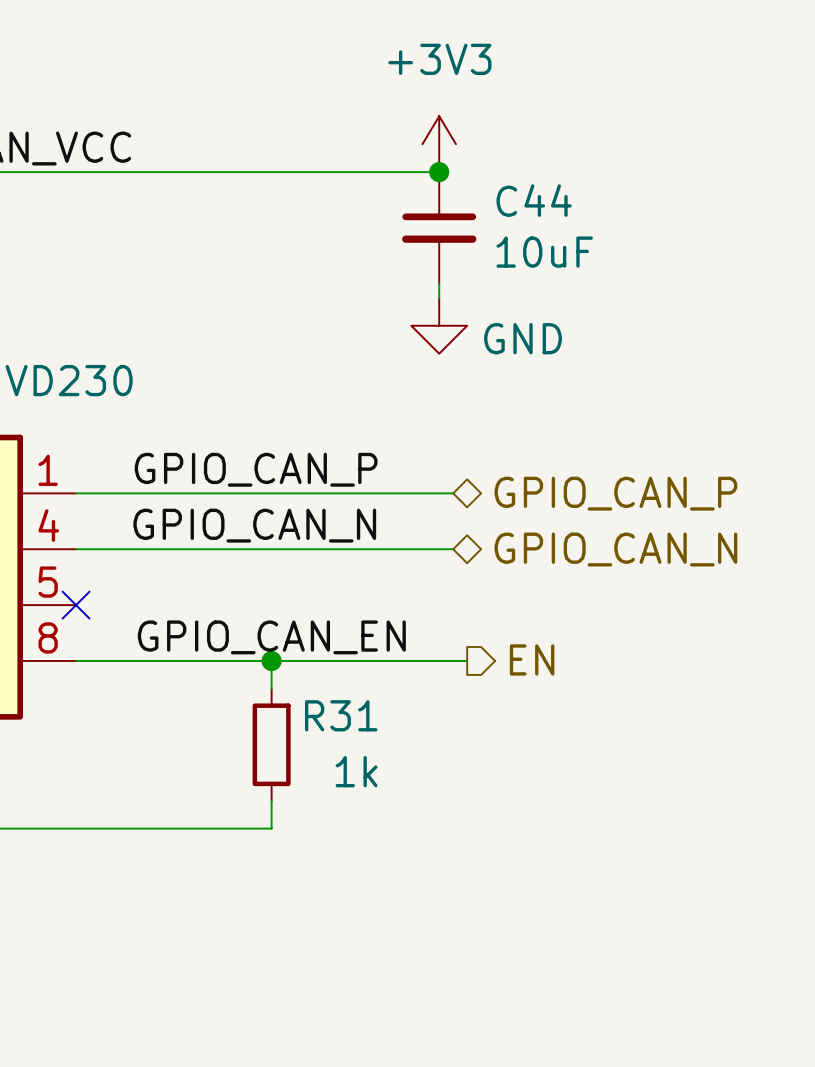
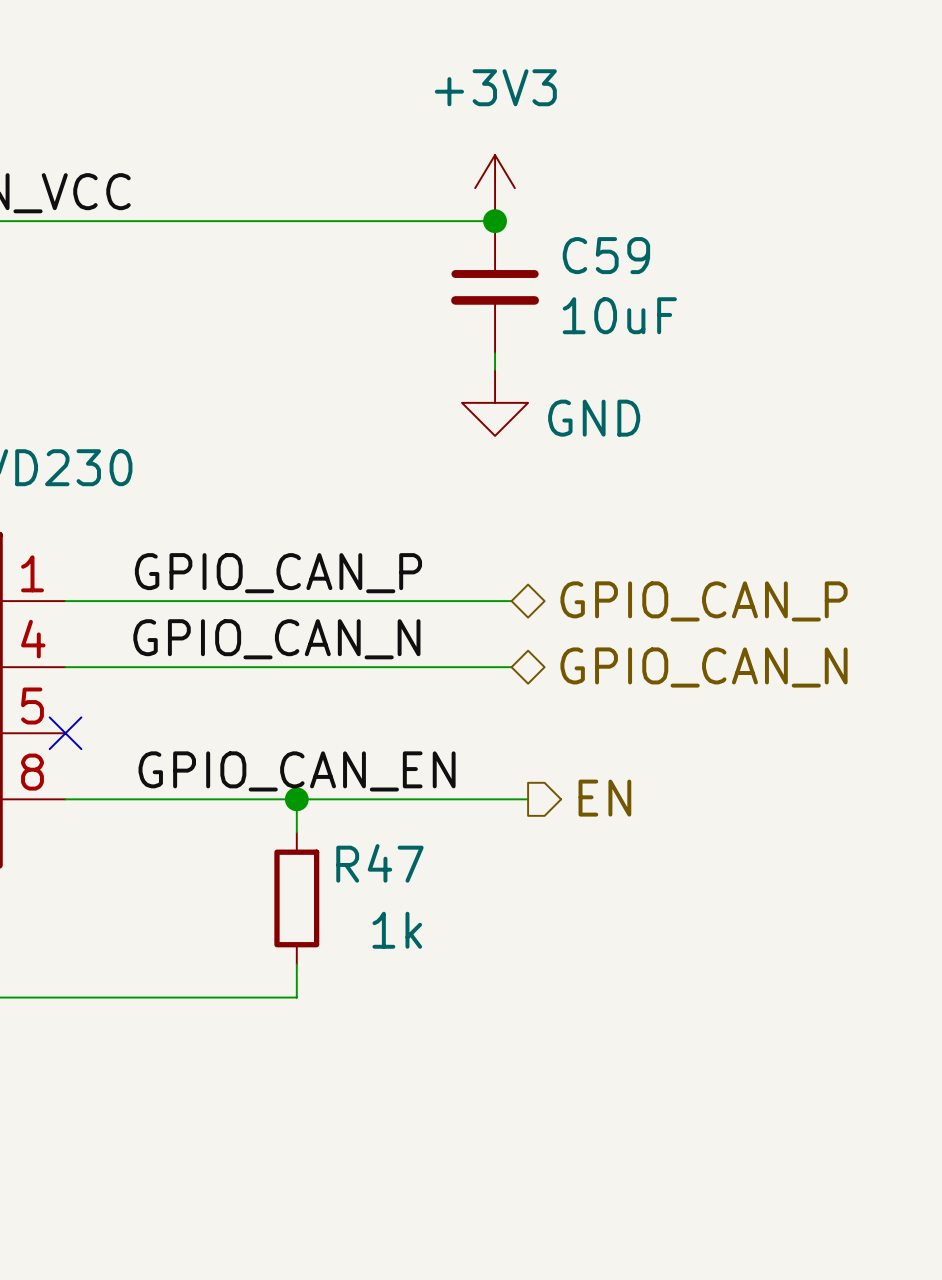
C44 name: C44 (534, 200) -> C59 (606, 255)
R31 name: R31 (341, 715) -> R47 (379, 863)

